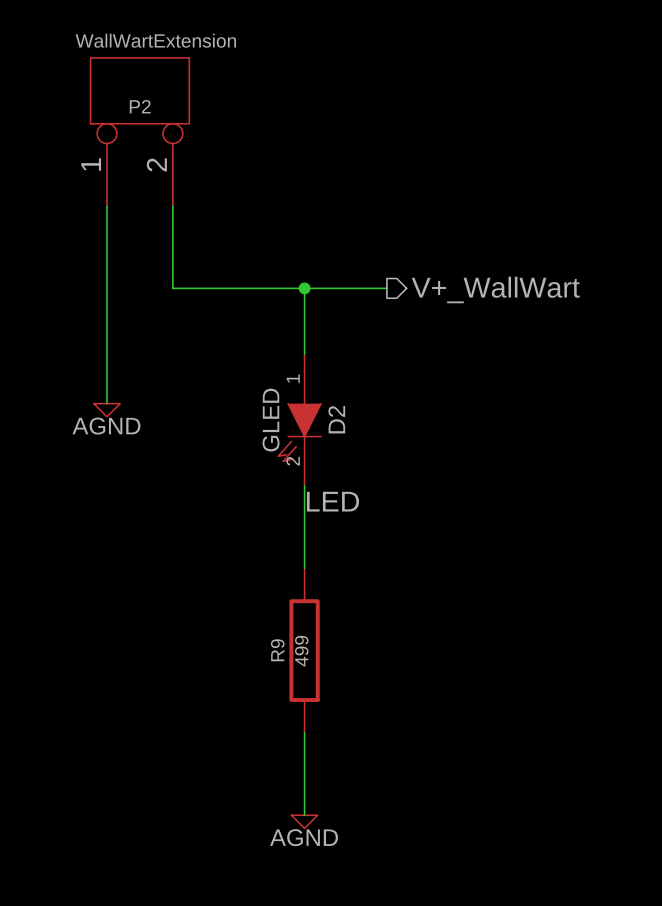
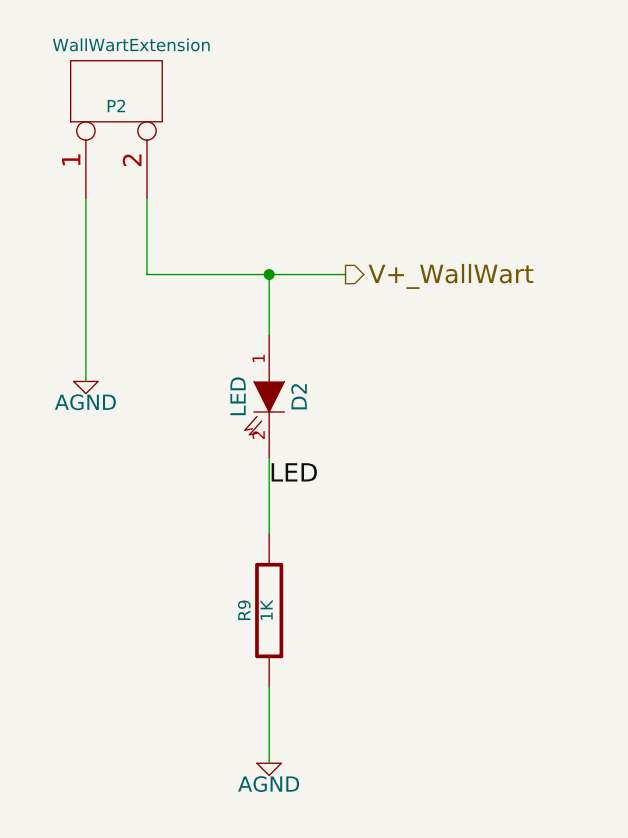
D2 value: GLED (271, 420) -> LED (238, 396)
R9 value: 499 (301, 651) -> 1K (266, 609)

